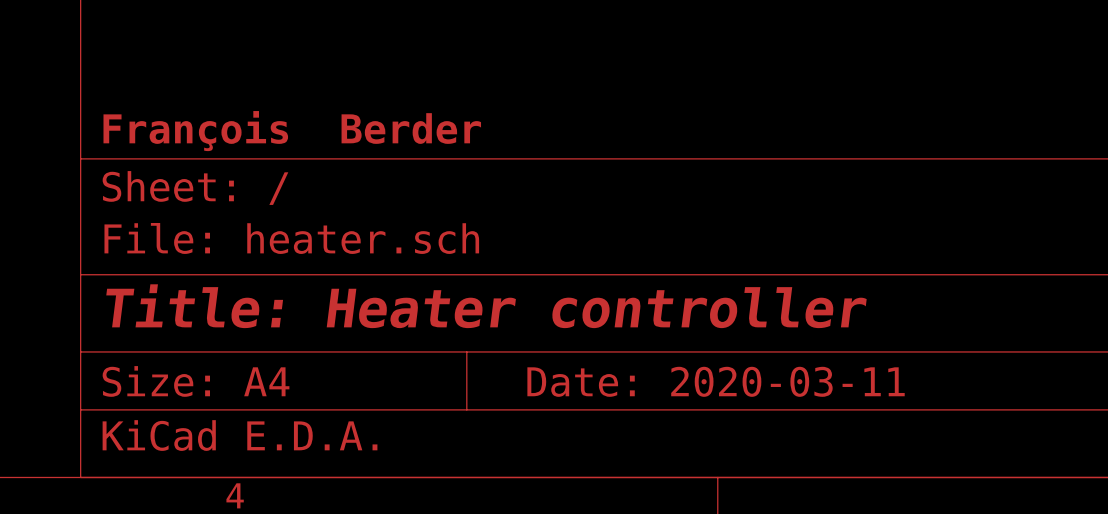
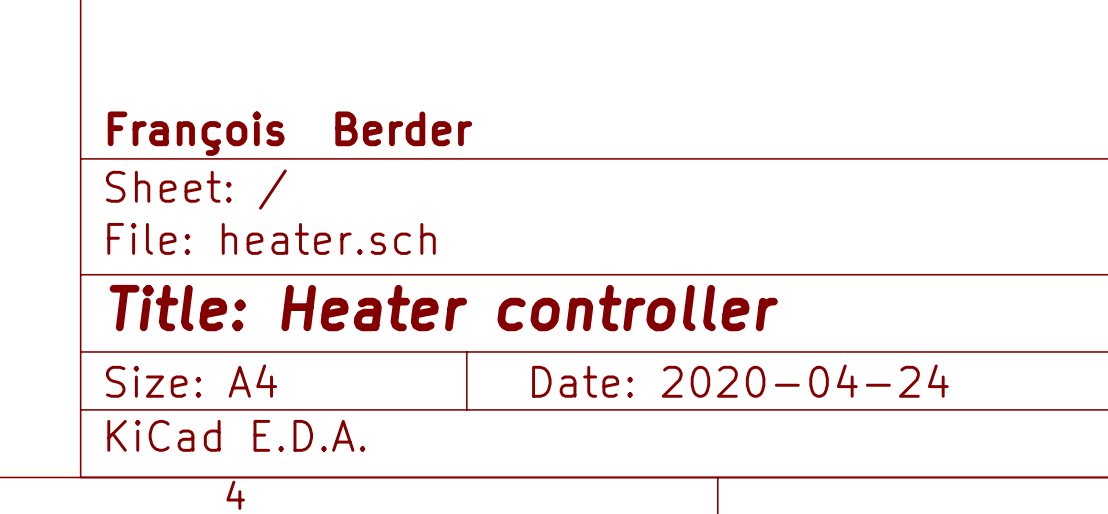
title block: Date: 2020-03-11 (716, 381) -> Date: 2020-04-24 (740, 381)

